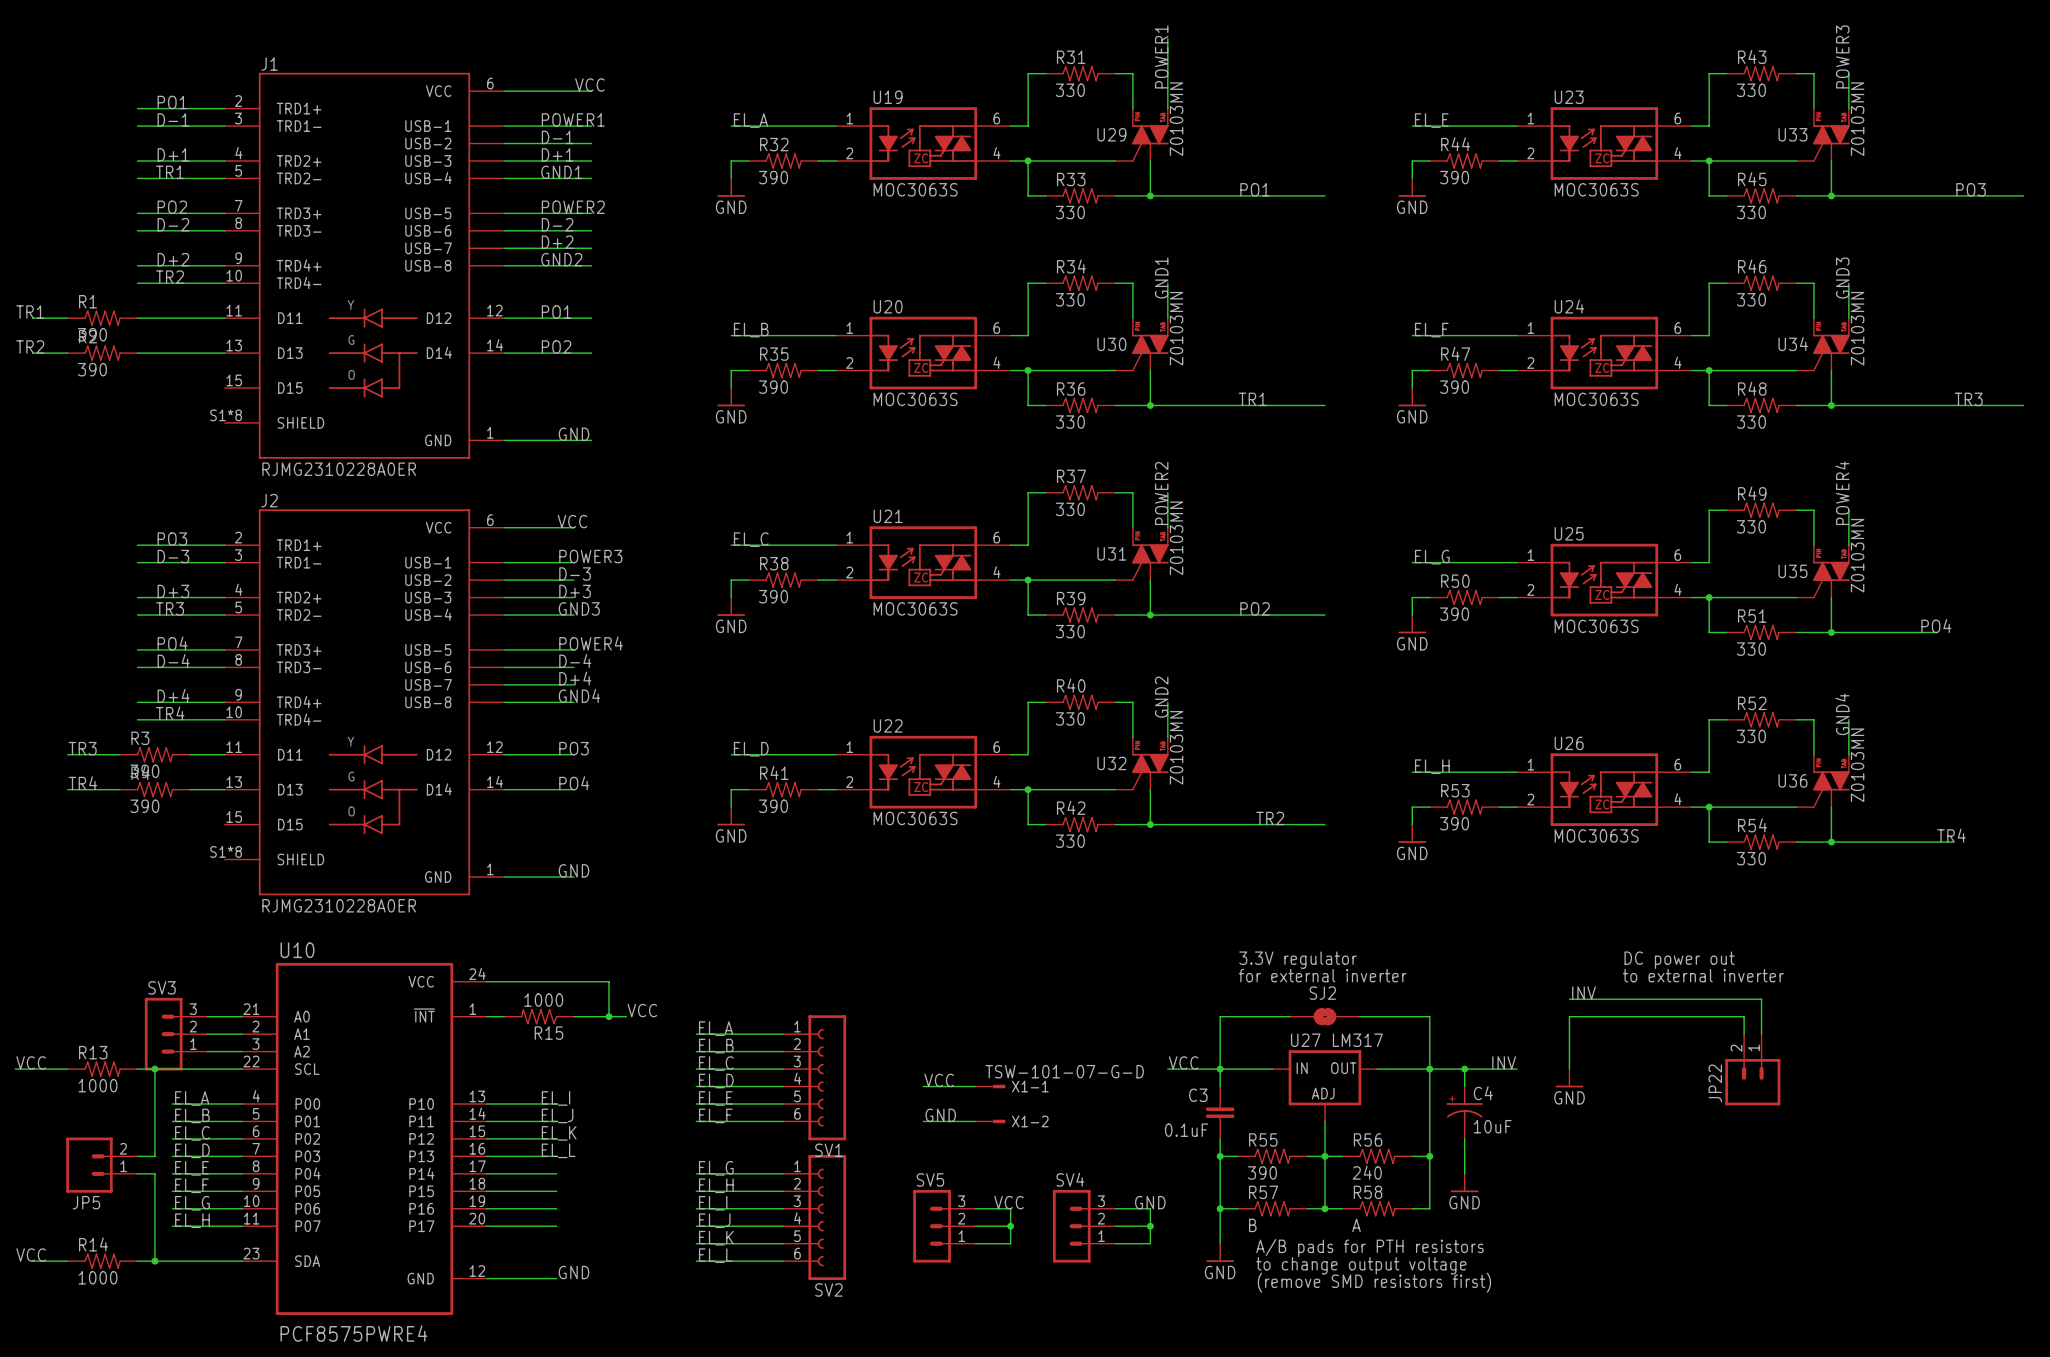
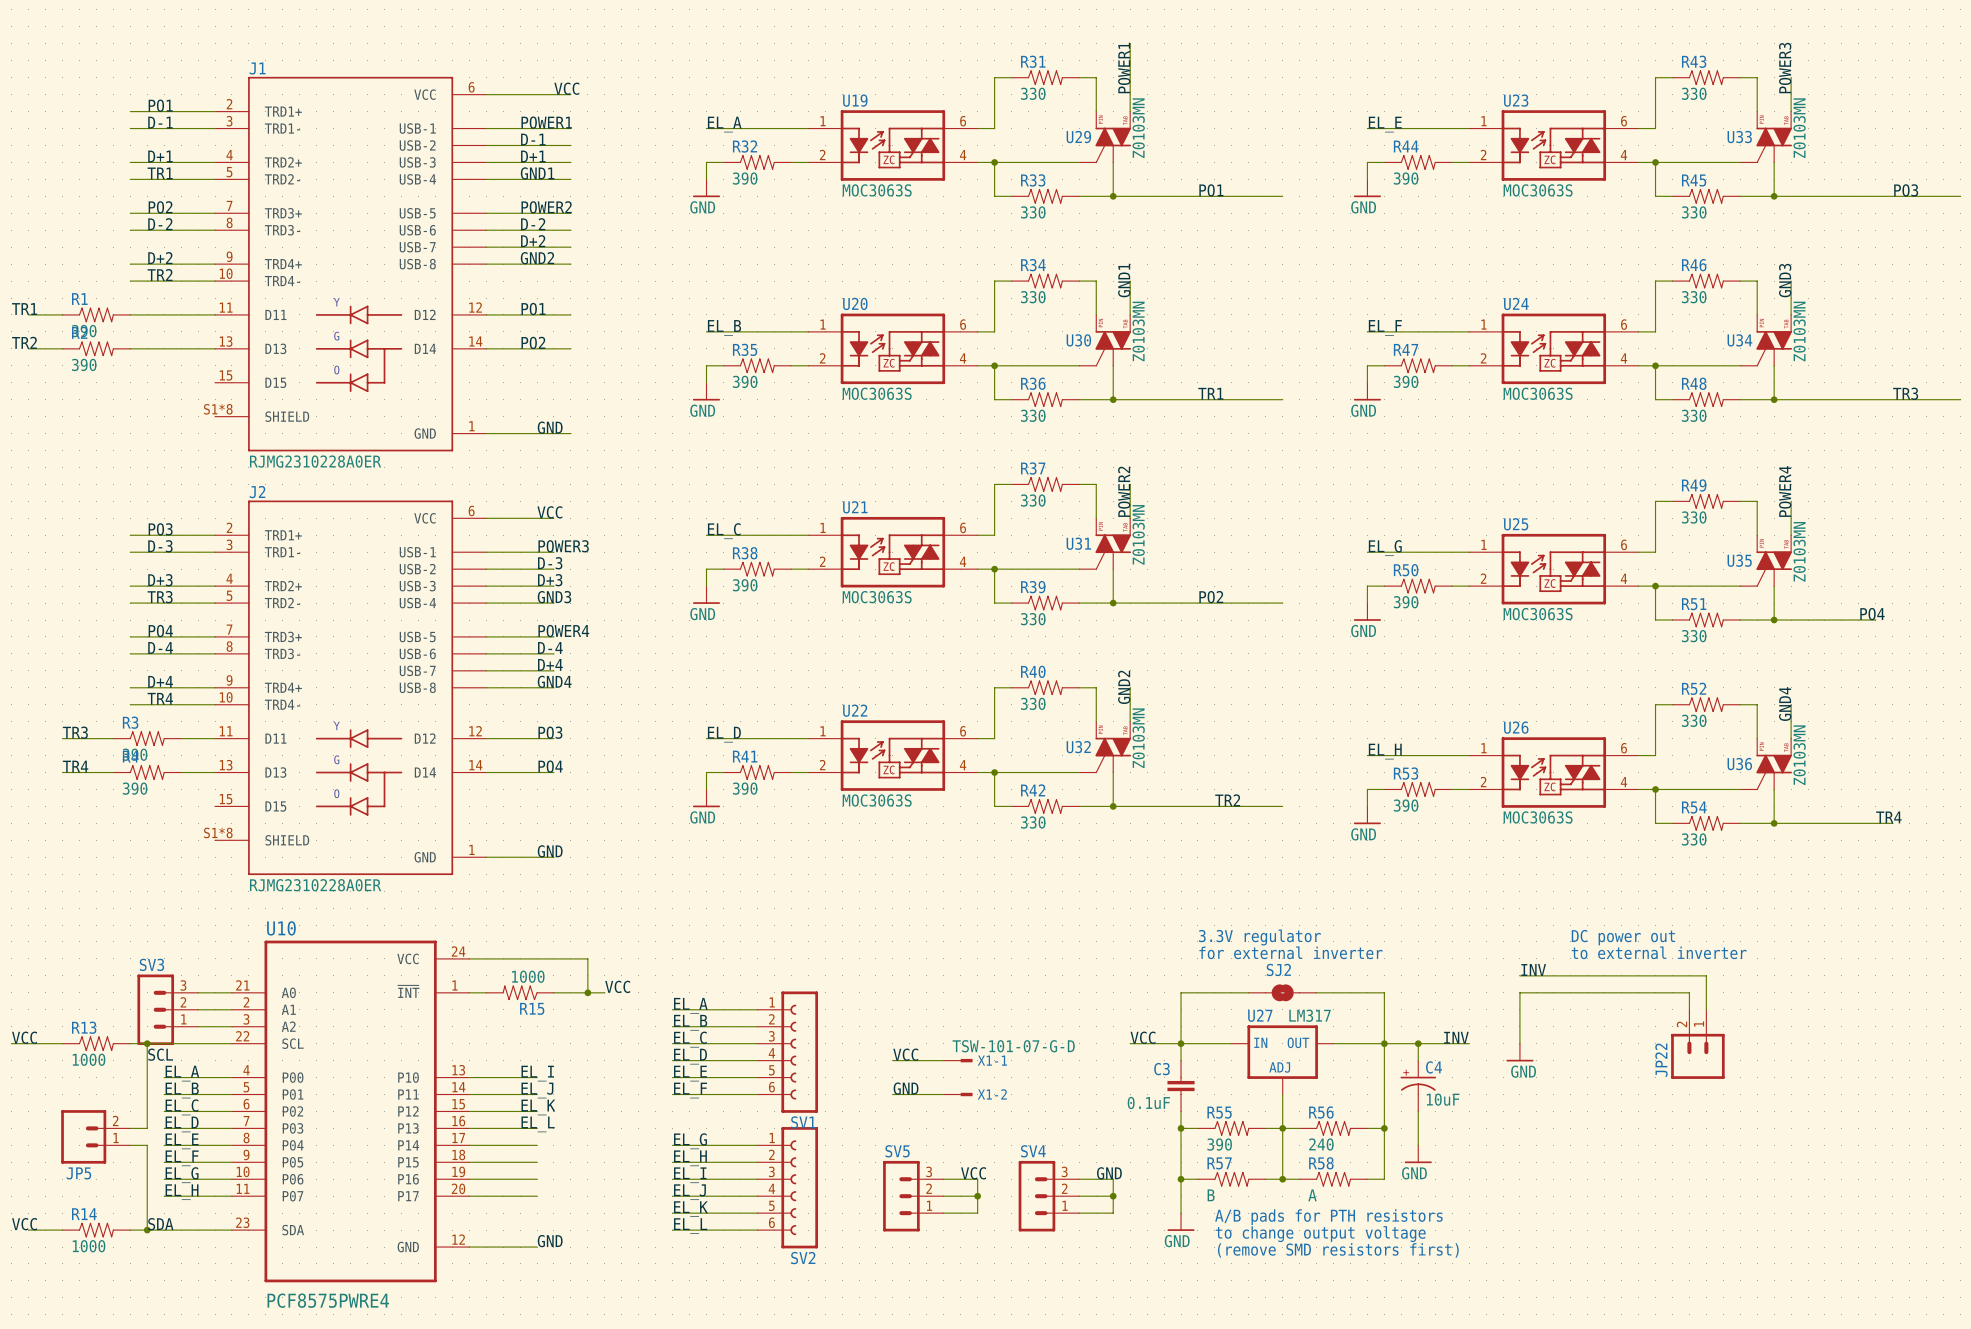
label: none -> SCL (160, 1054)
label: none -> SDA (160, 1224)

